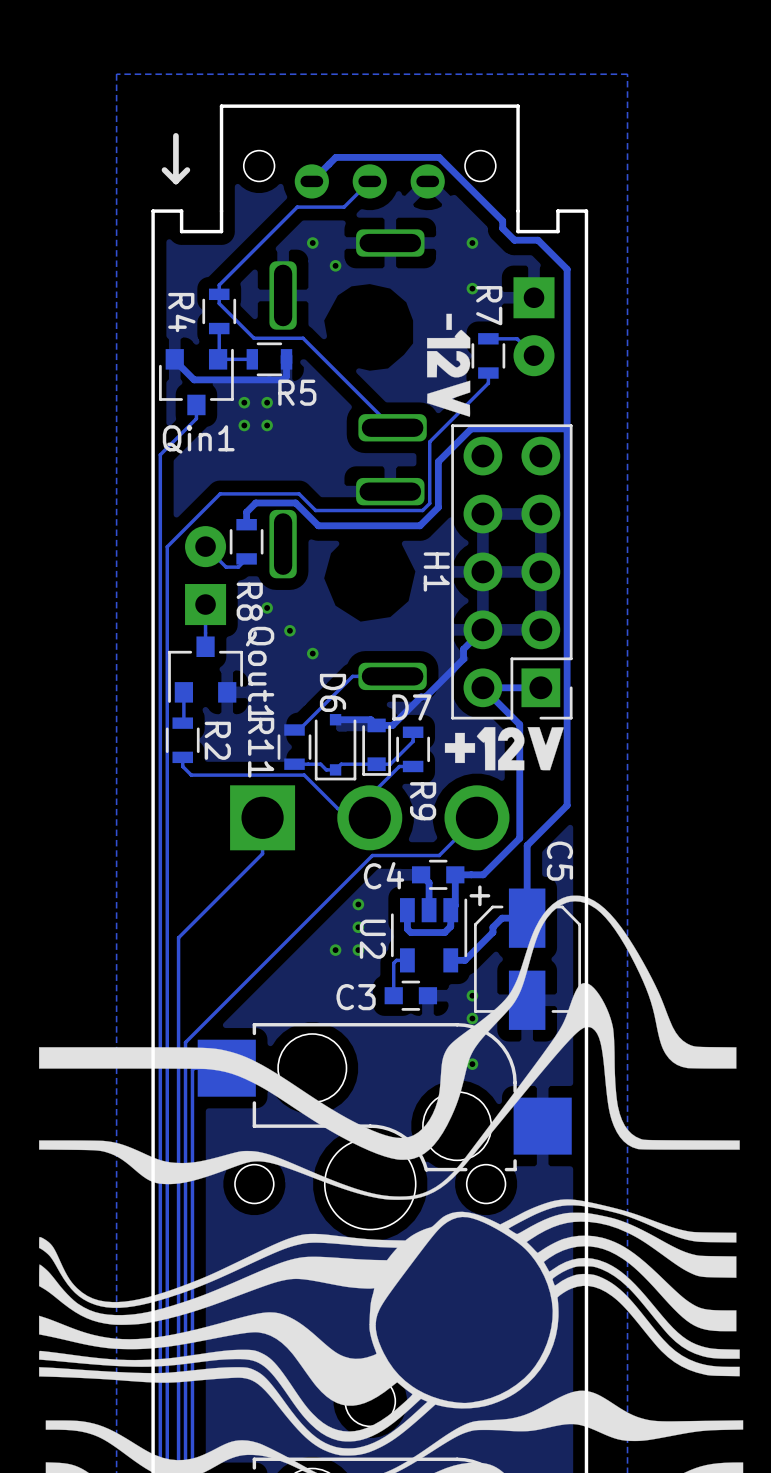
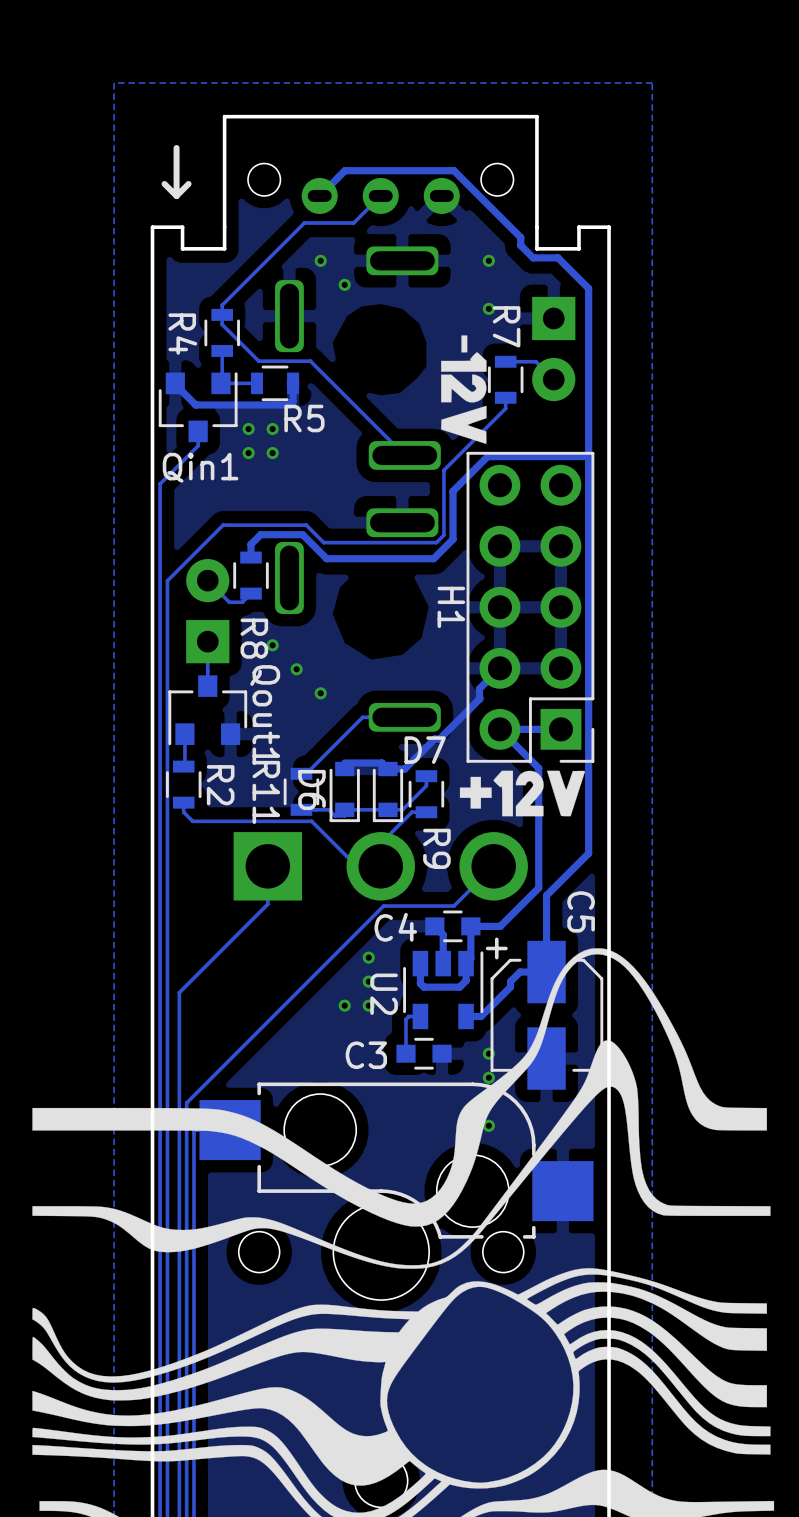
D6 name position: D6 (333, 692) -> D6 (311, 790)
D6 footprint: [314, 714, 357, 781] -> [329, 761, 360, 823]

